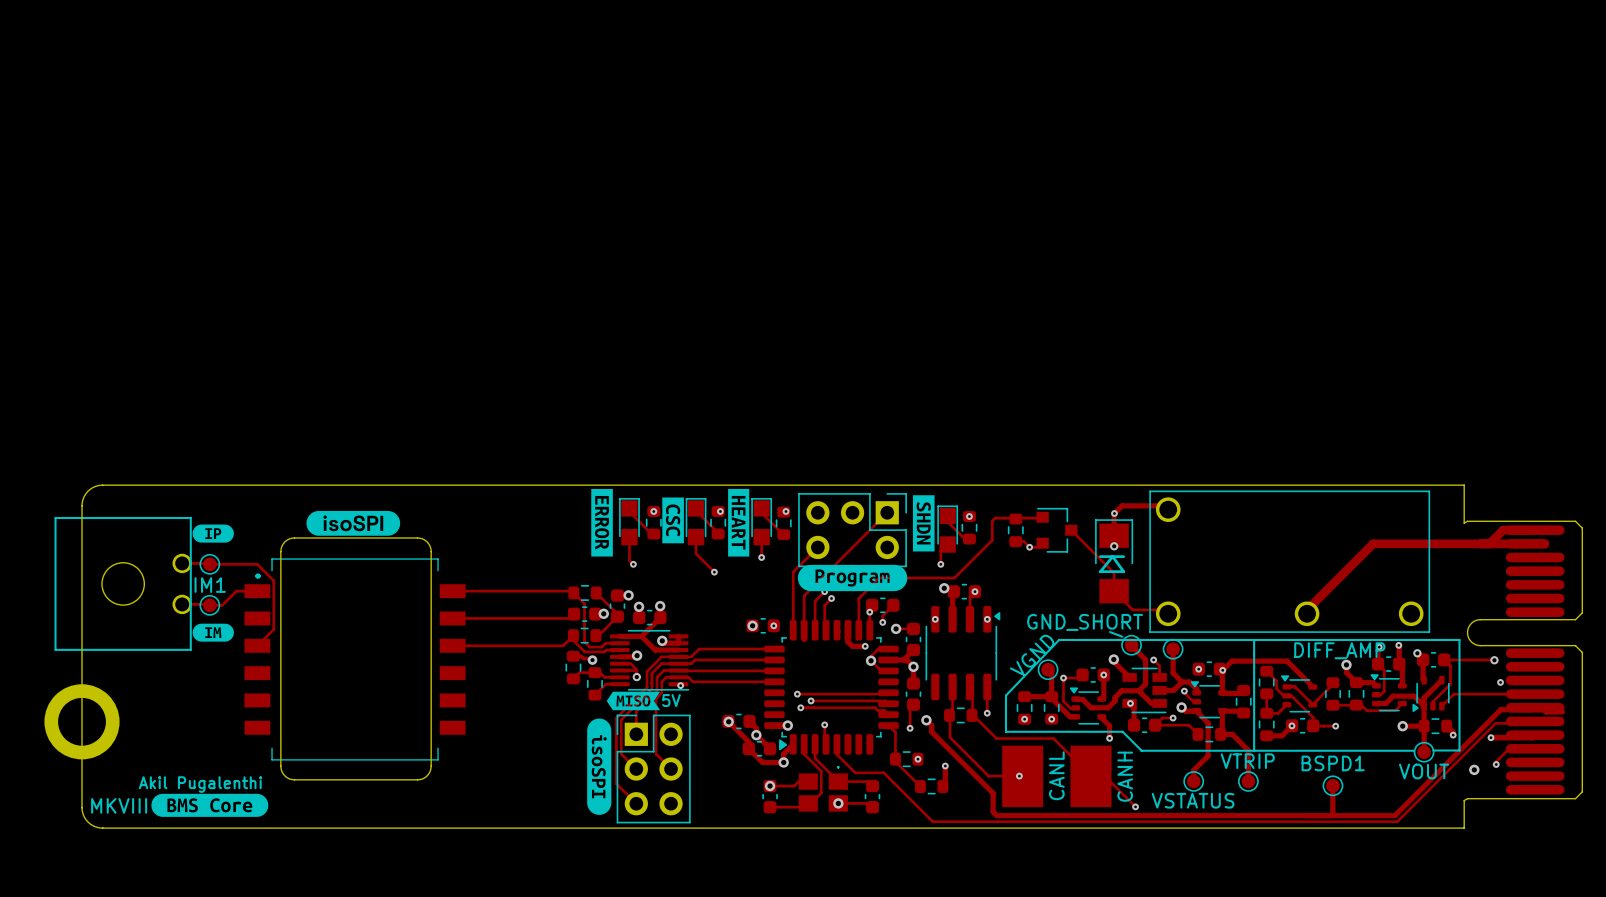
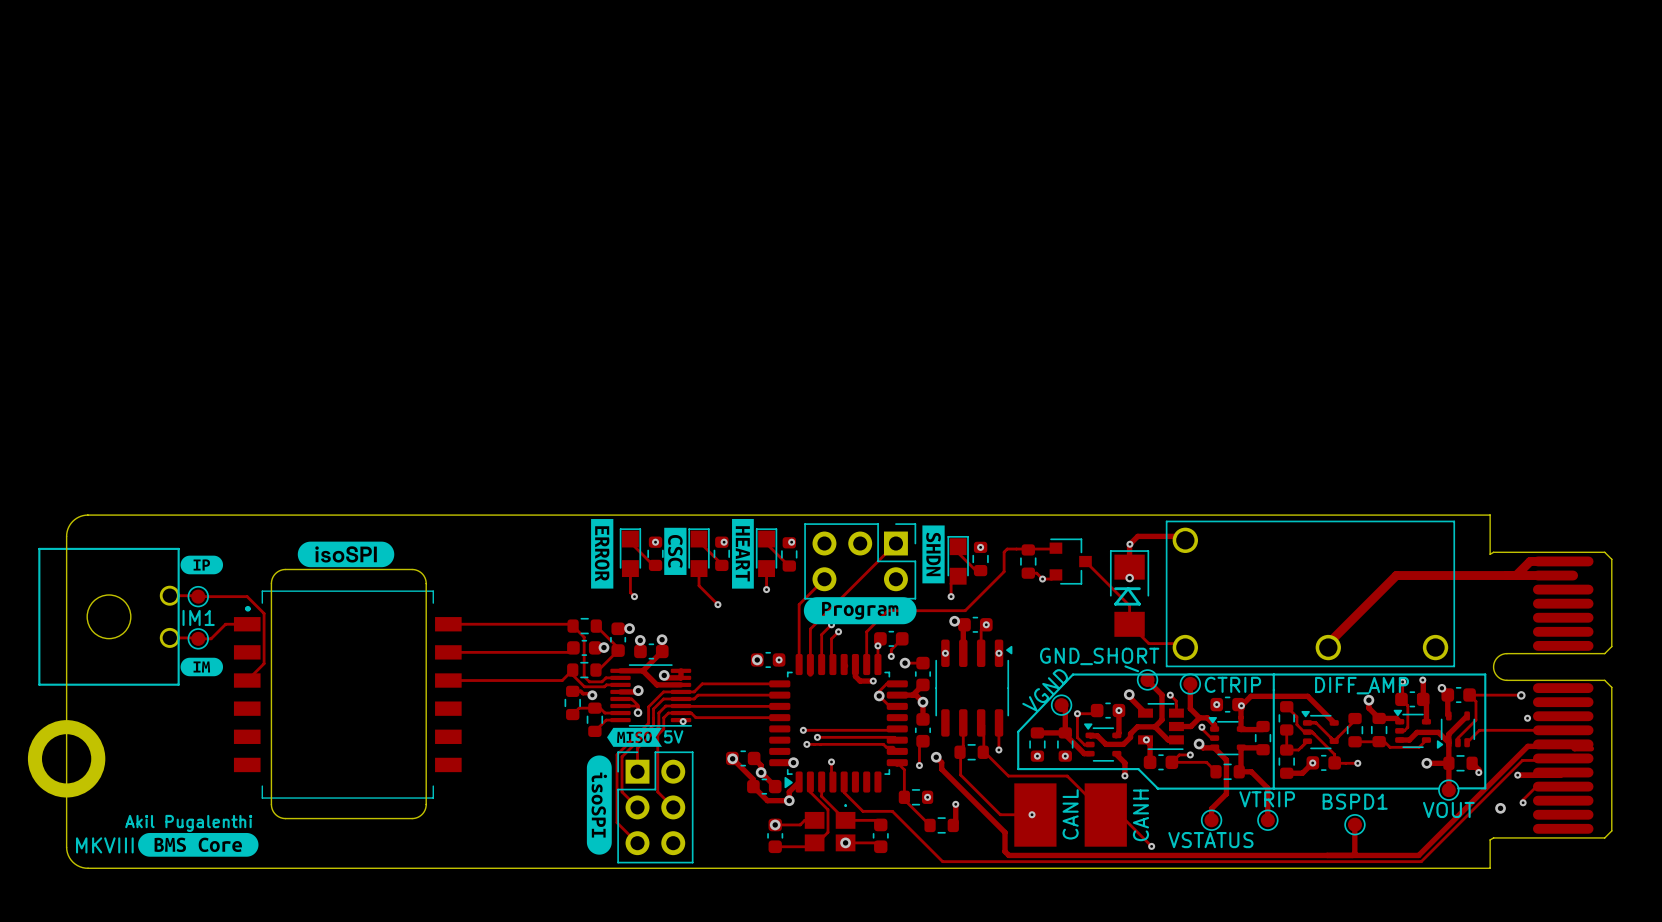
text: none -> CTRIP (1232, 684)

